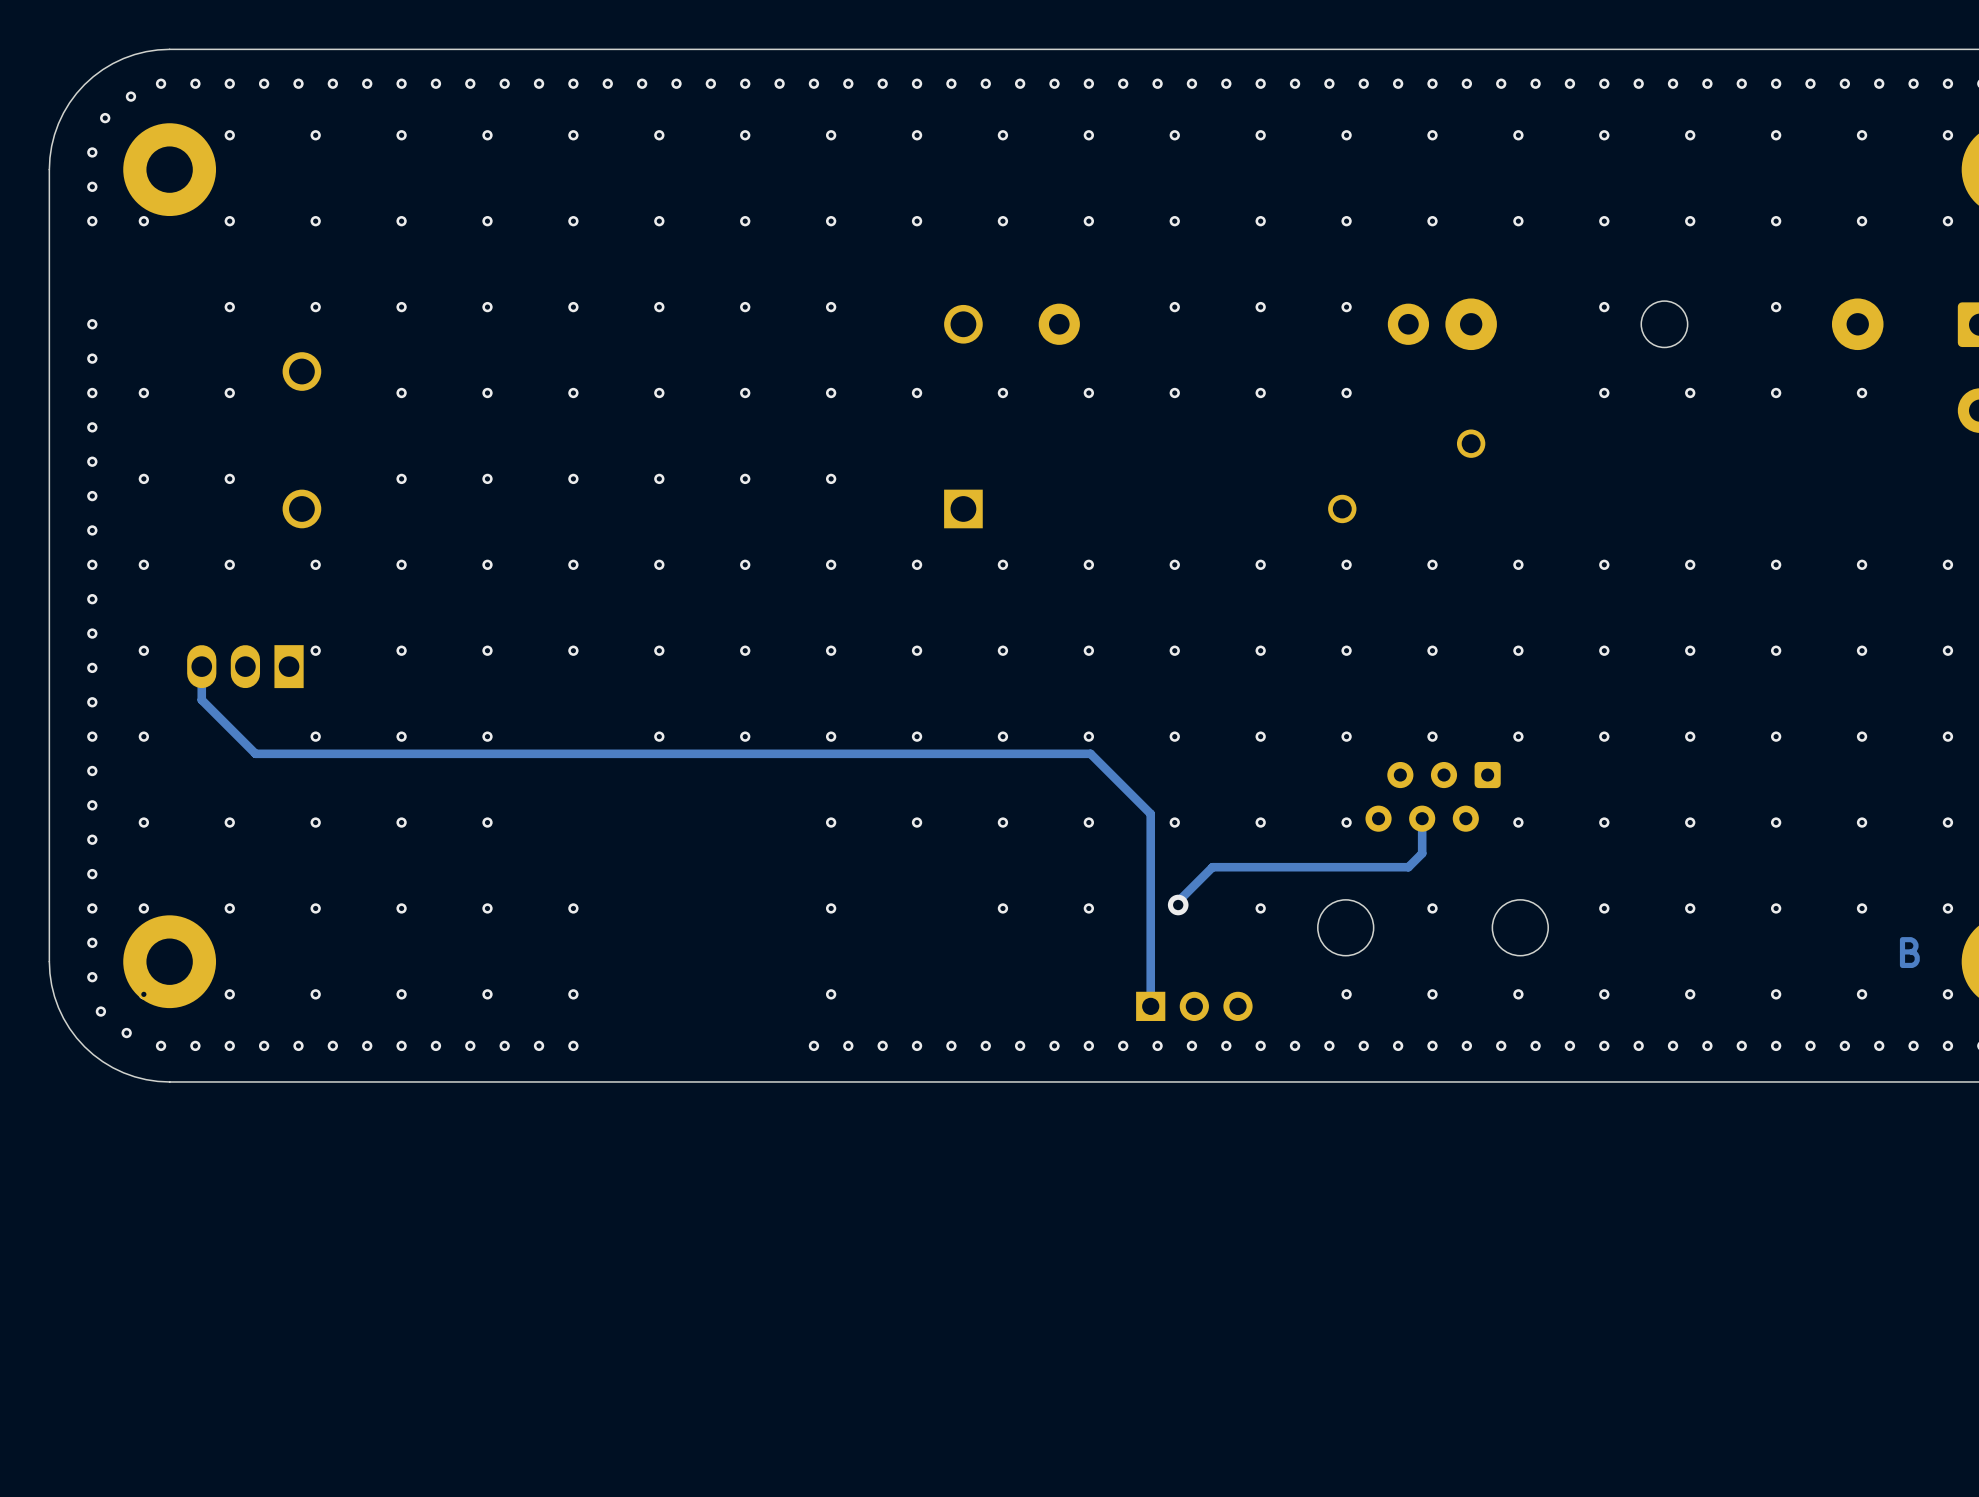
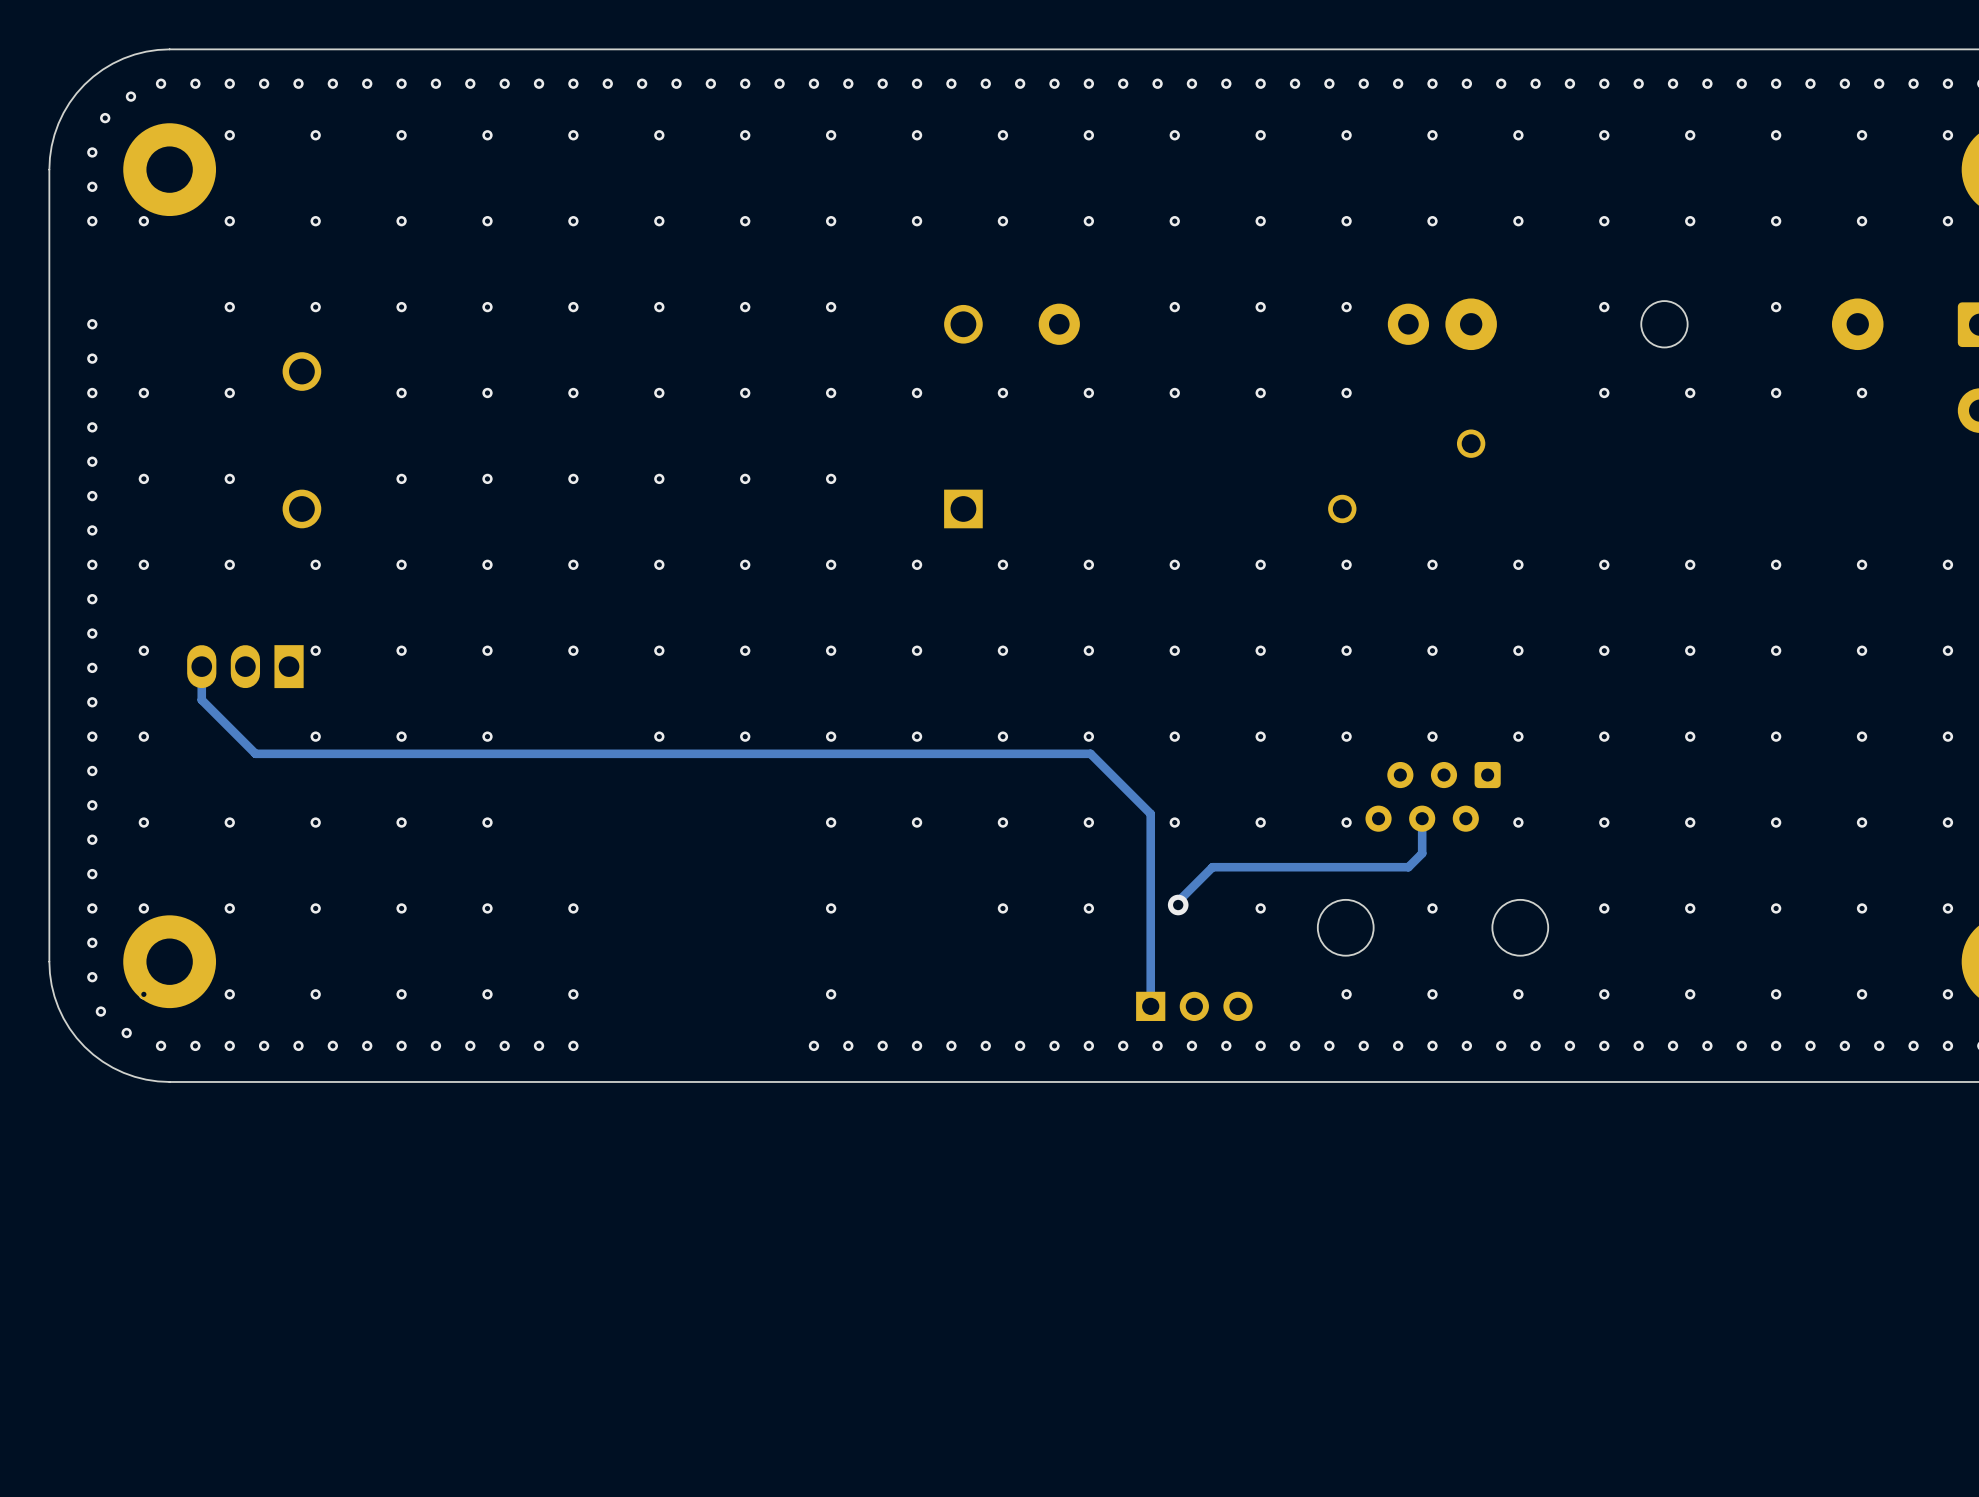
text: B (1909, 952) -> none

